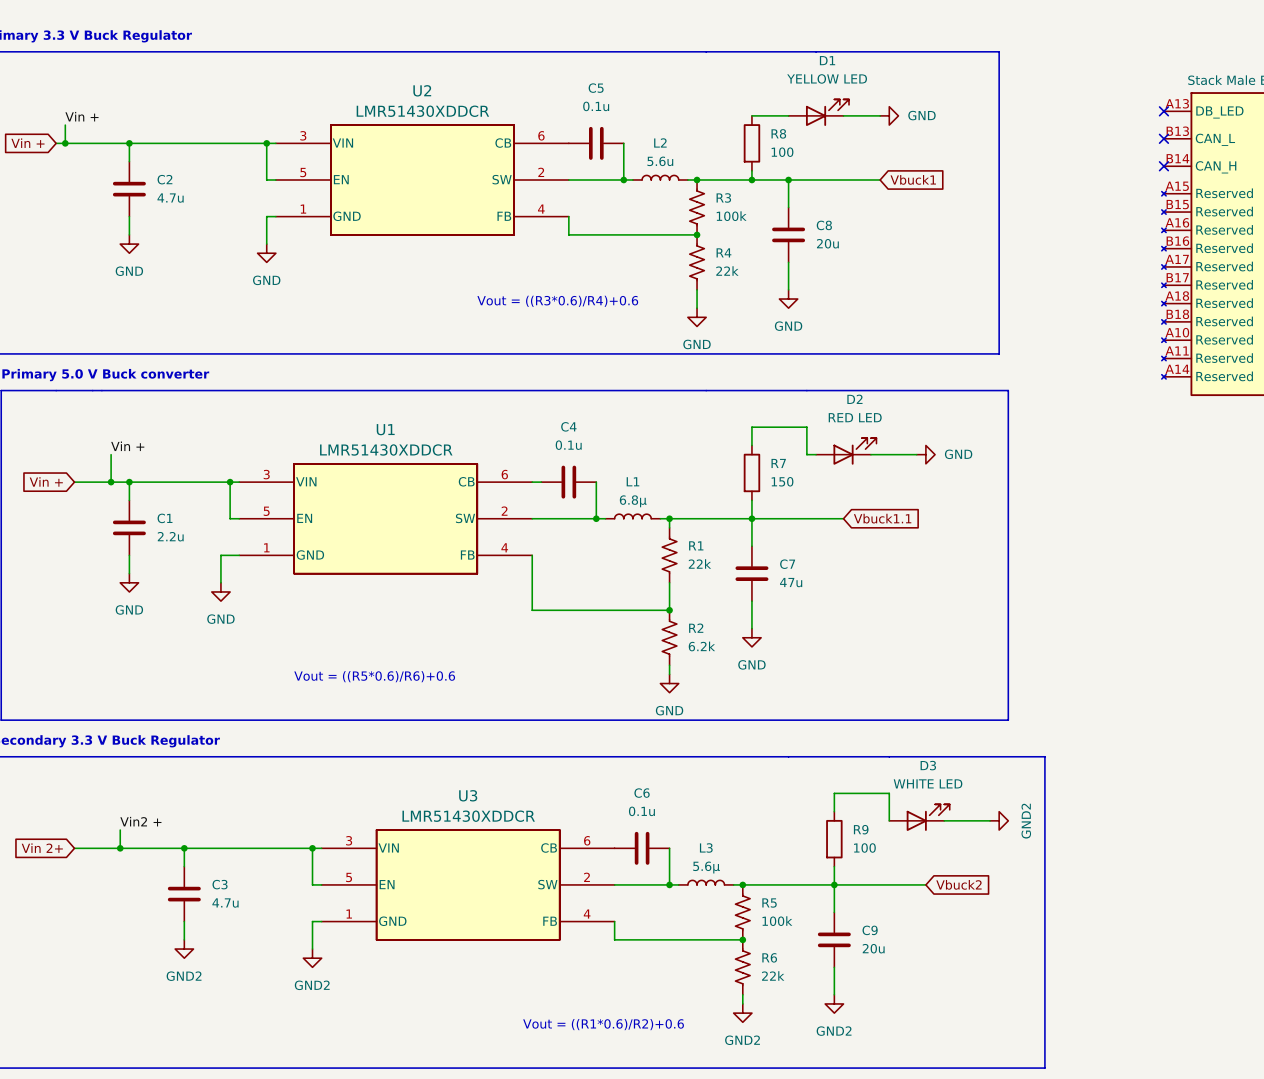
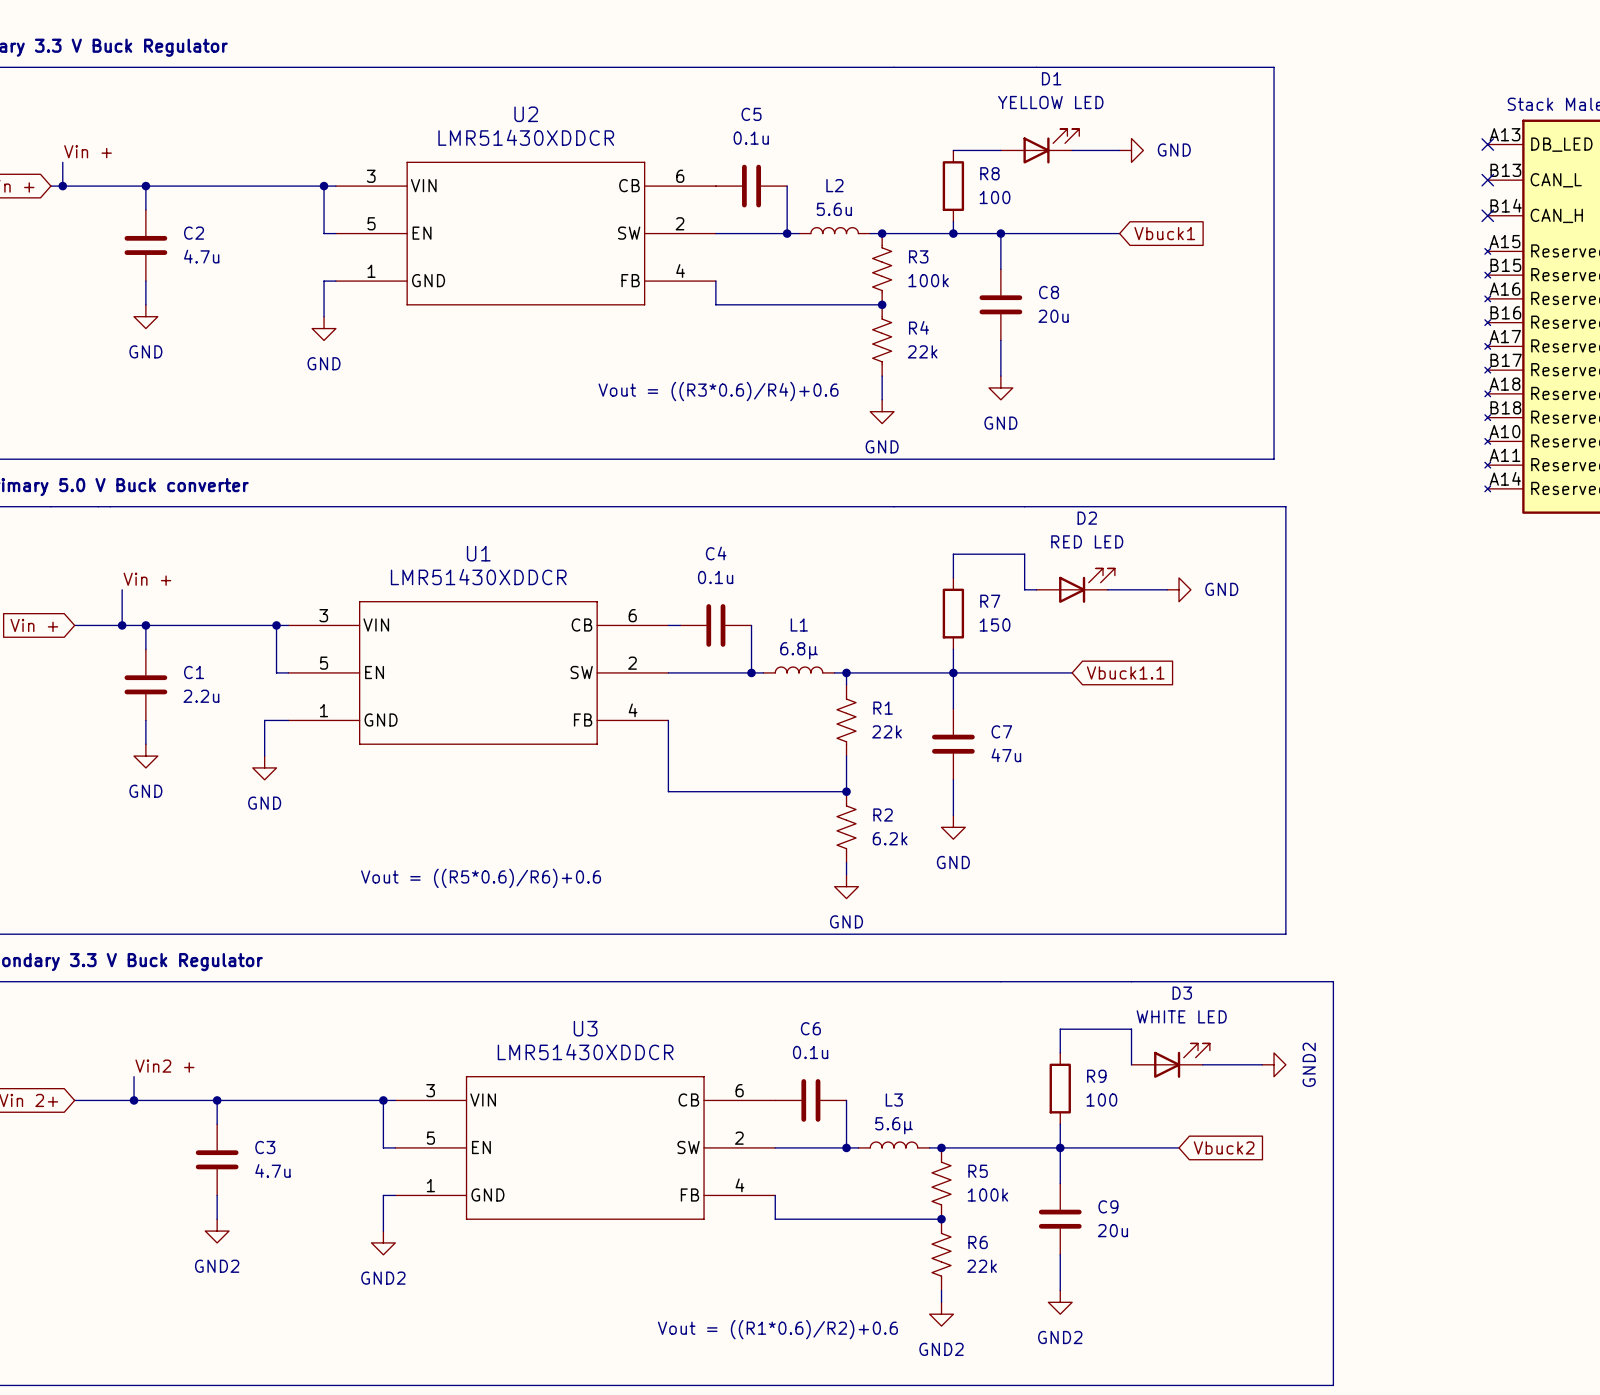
U2 symbol: [275, 124, 569, 236] -> [335, 161, 716, 306]
U1 symbol: [239, 463, 533, 575] -> [288, 601, 669, 745]
U3 symbol: [321, 829, 615, 941] -> [395, 1076, 776, 1220]

